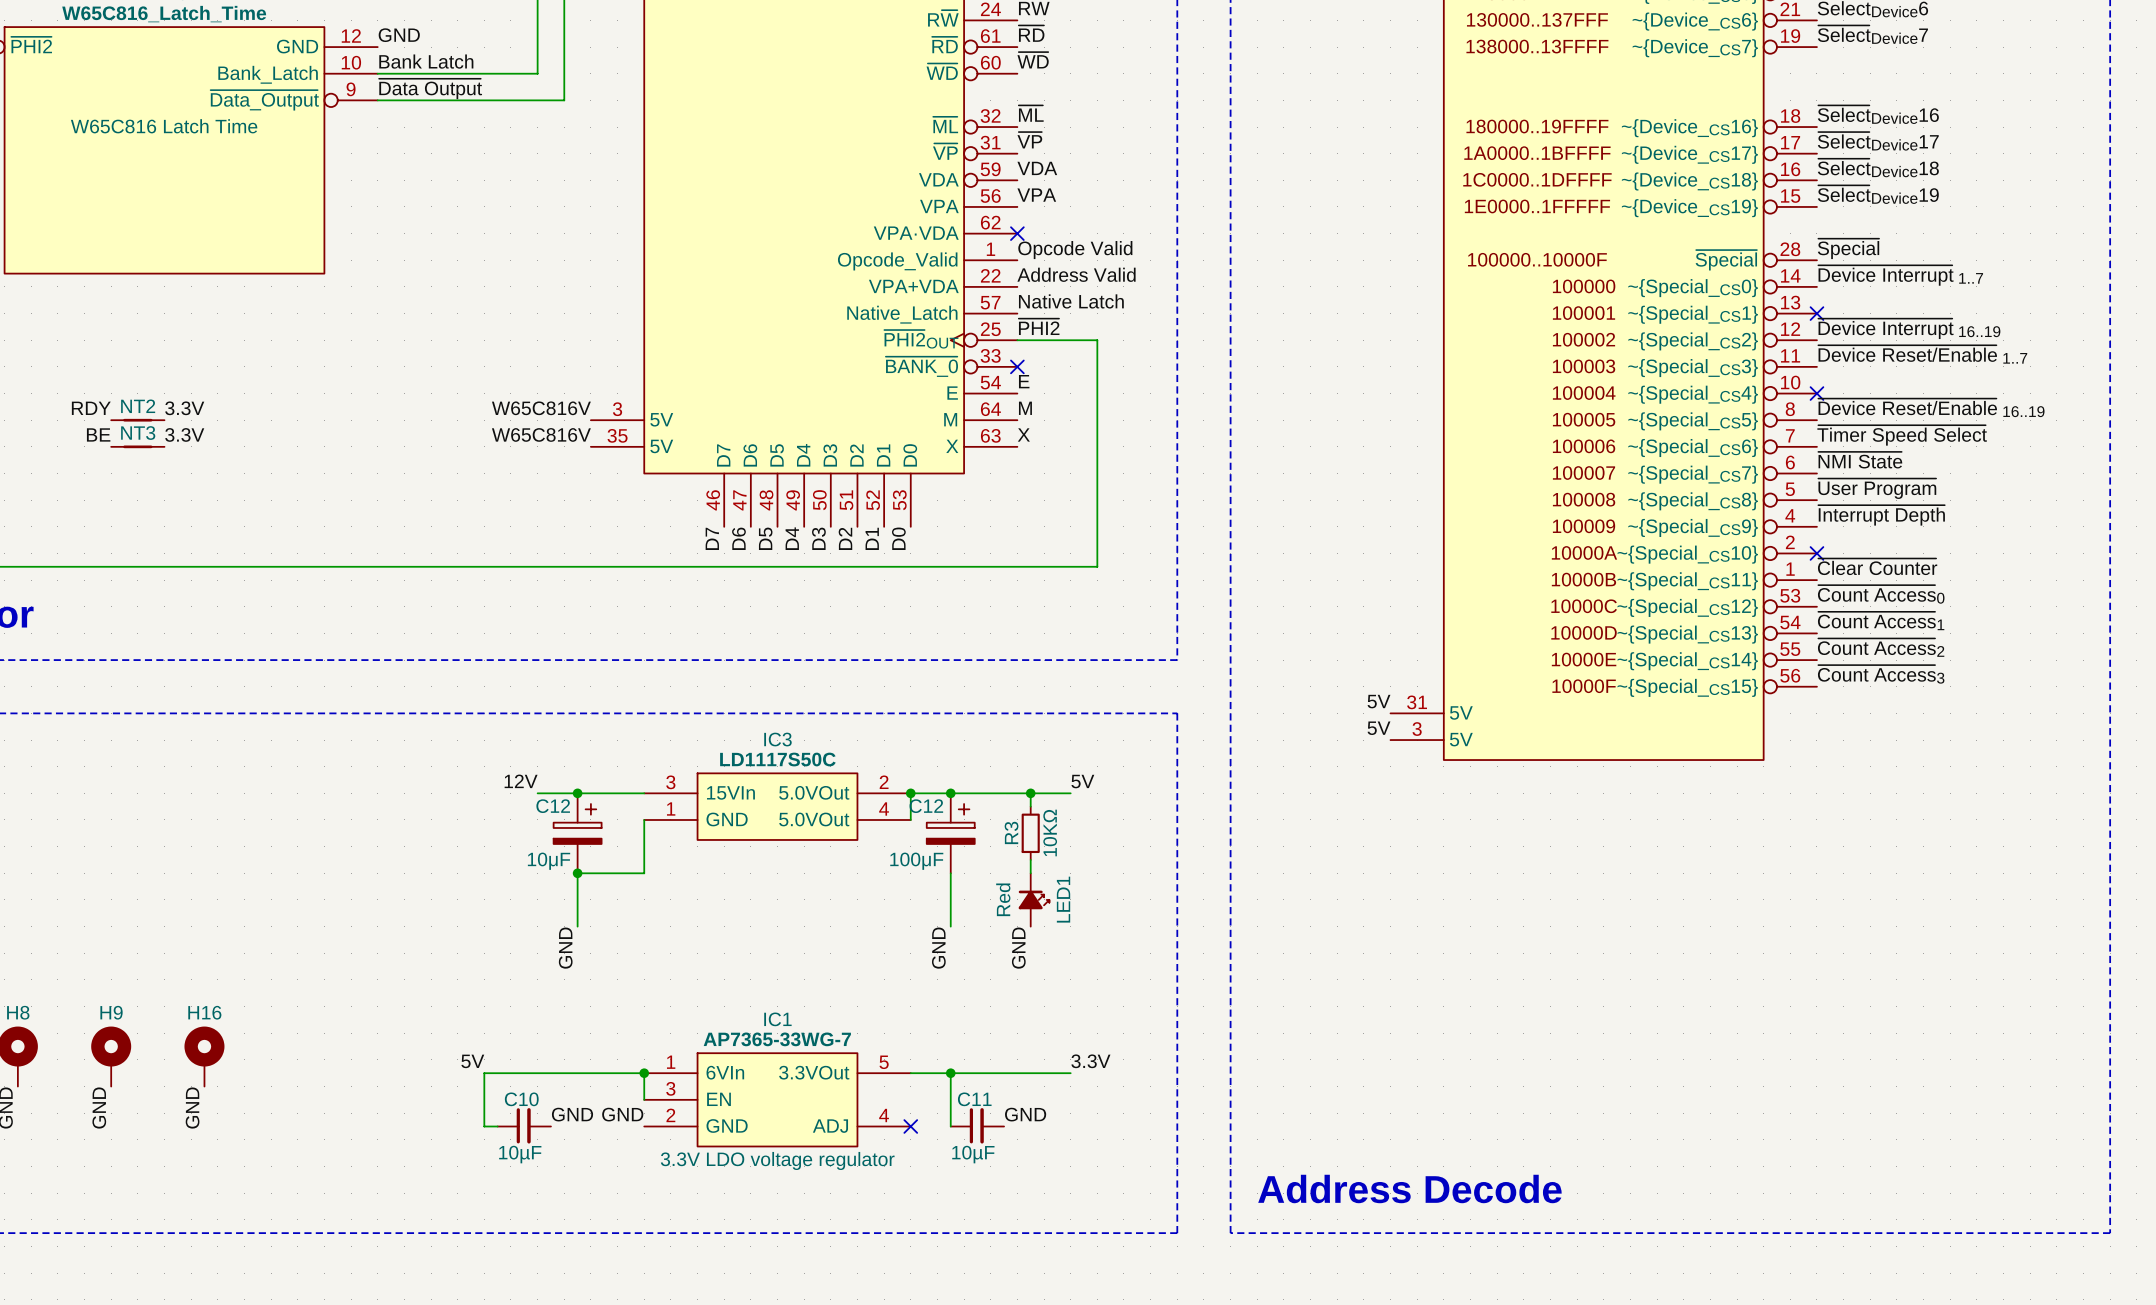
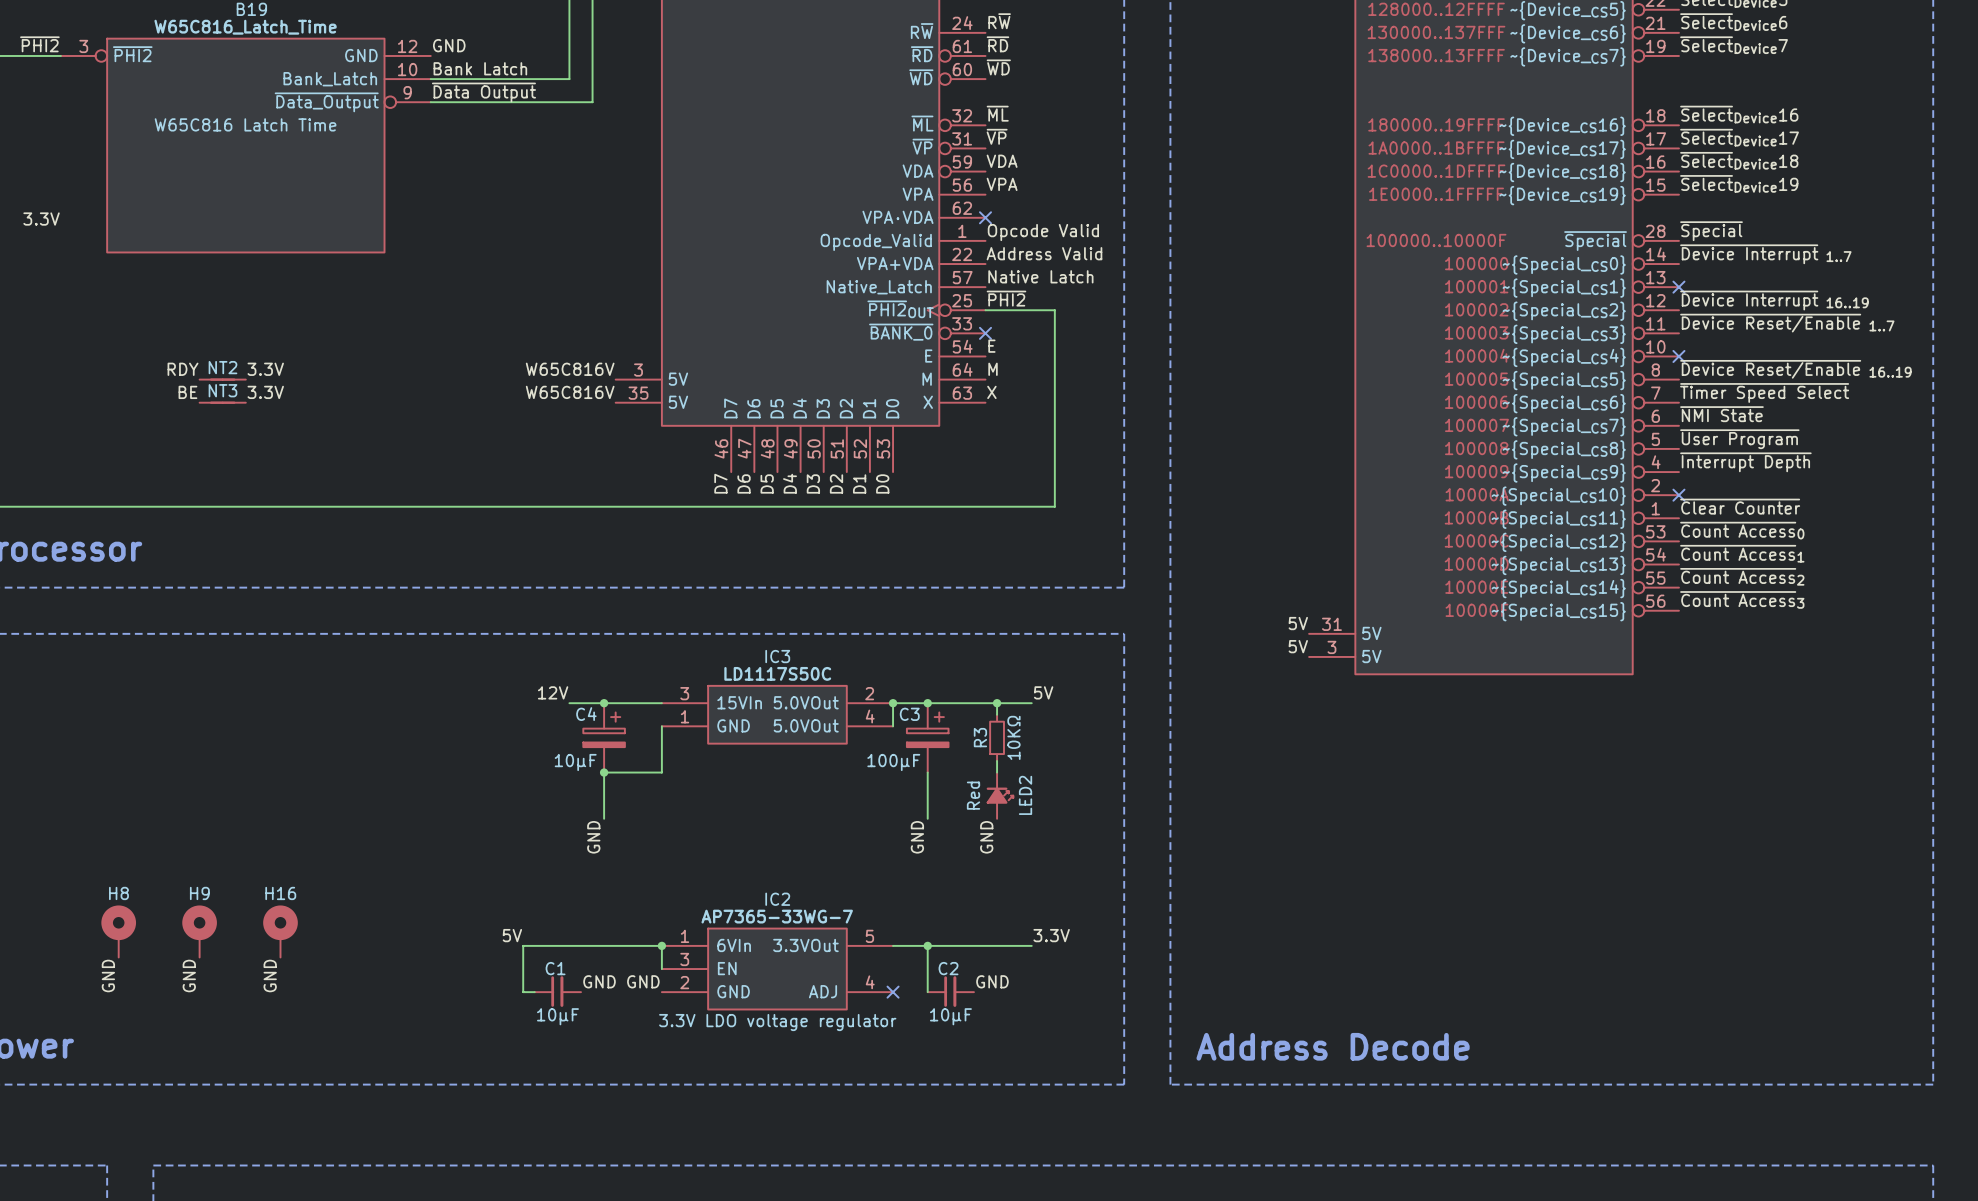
C12 name: C12 (553, 806) -> C4 (586, 714)
C12 name: C12 (926, 806) -> C3 (909, 714)
LED1 name: LED1 (1063, 899) -> LED2 (1025, 795)
IC1 name: IC1 (777, 1019) -> IC2 (777, 899)
C10 name: C10 (521, 1099) -> C1 (555, 968)
C11 name: C11 (974, 1099) -> C2 (948, 968)

